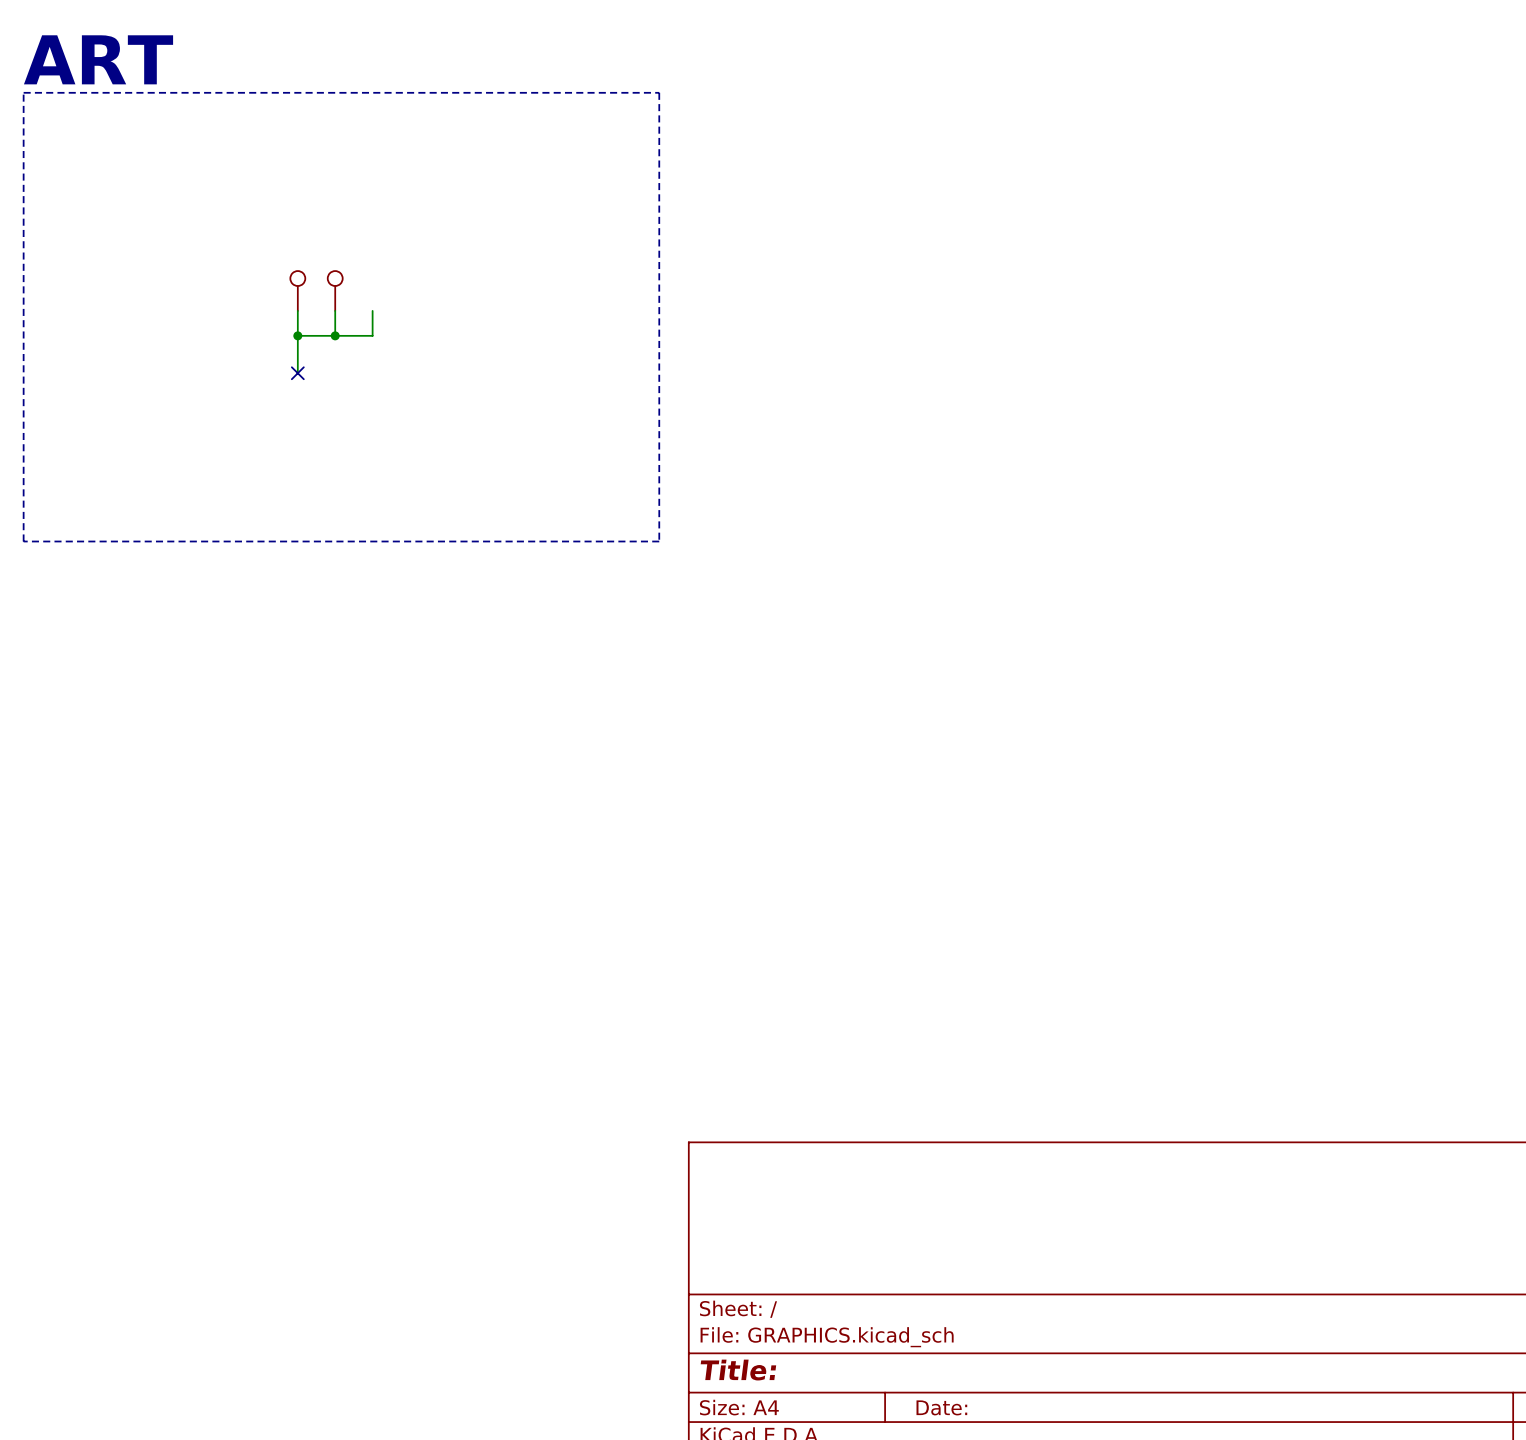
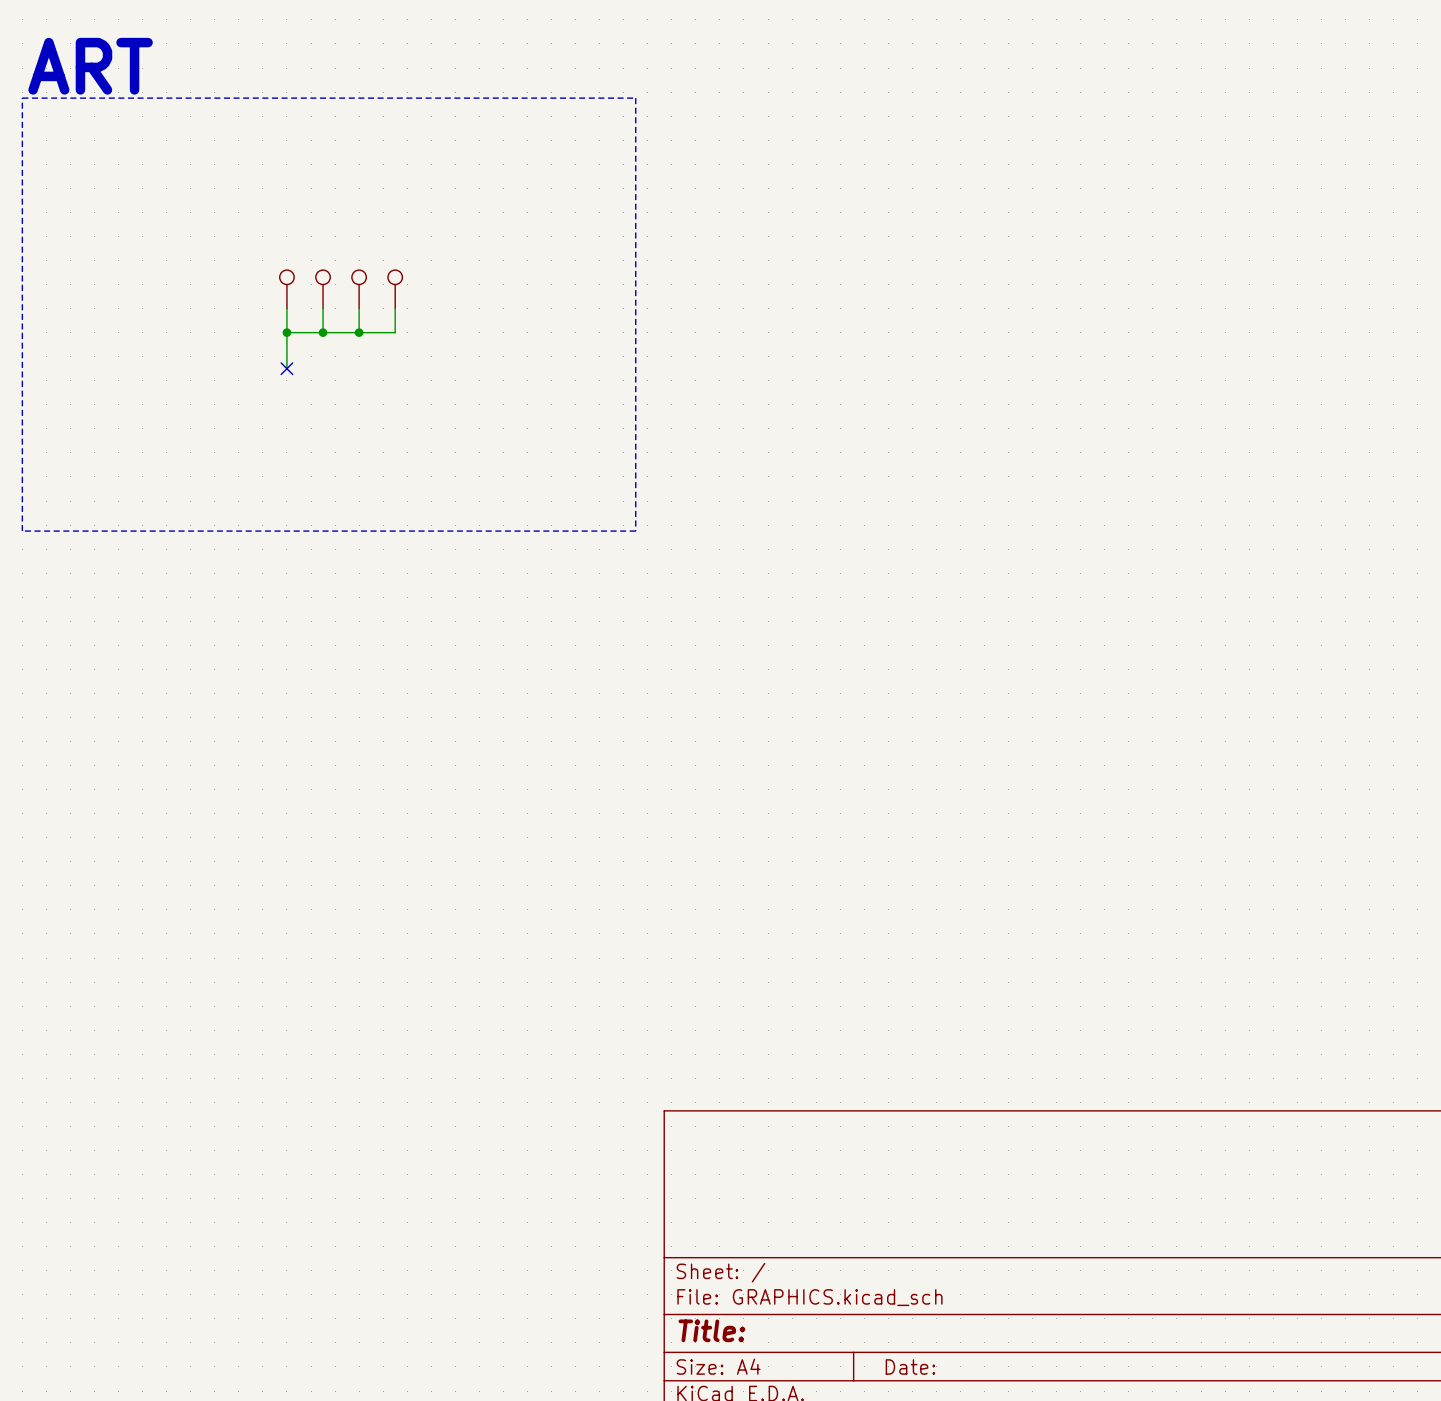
part: none -> (359, 289)
part: none -> (395, 289)
wire: none -> (395, 308) (395, 332) (359, 332)
junction: none -> (359, 332)

